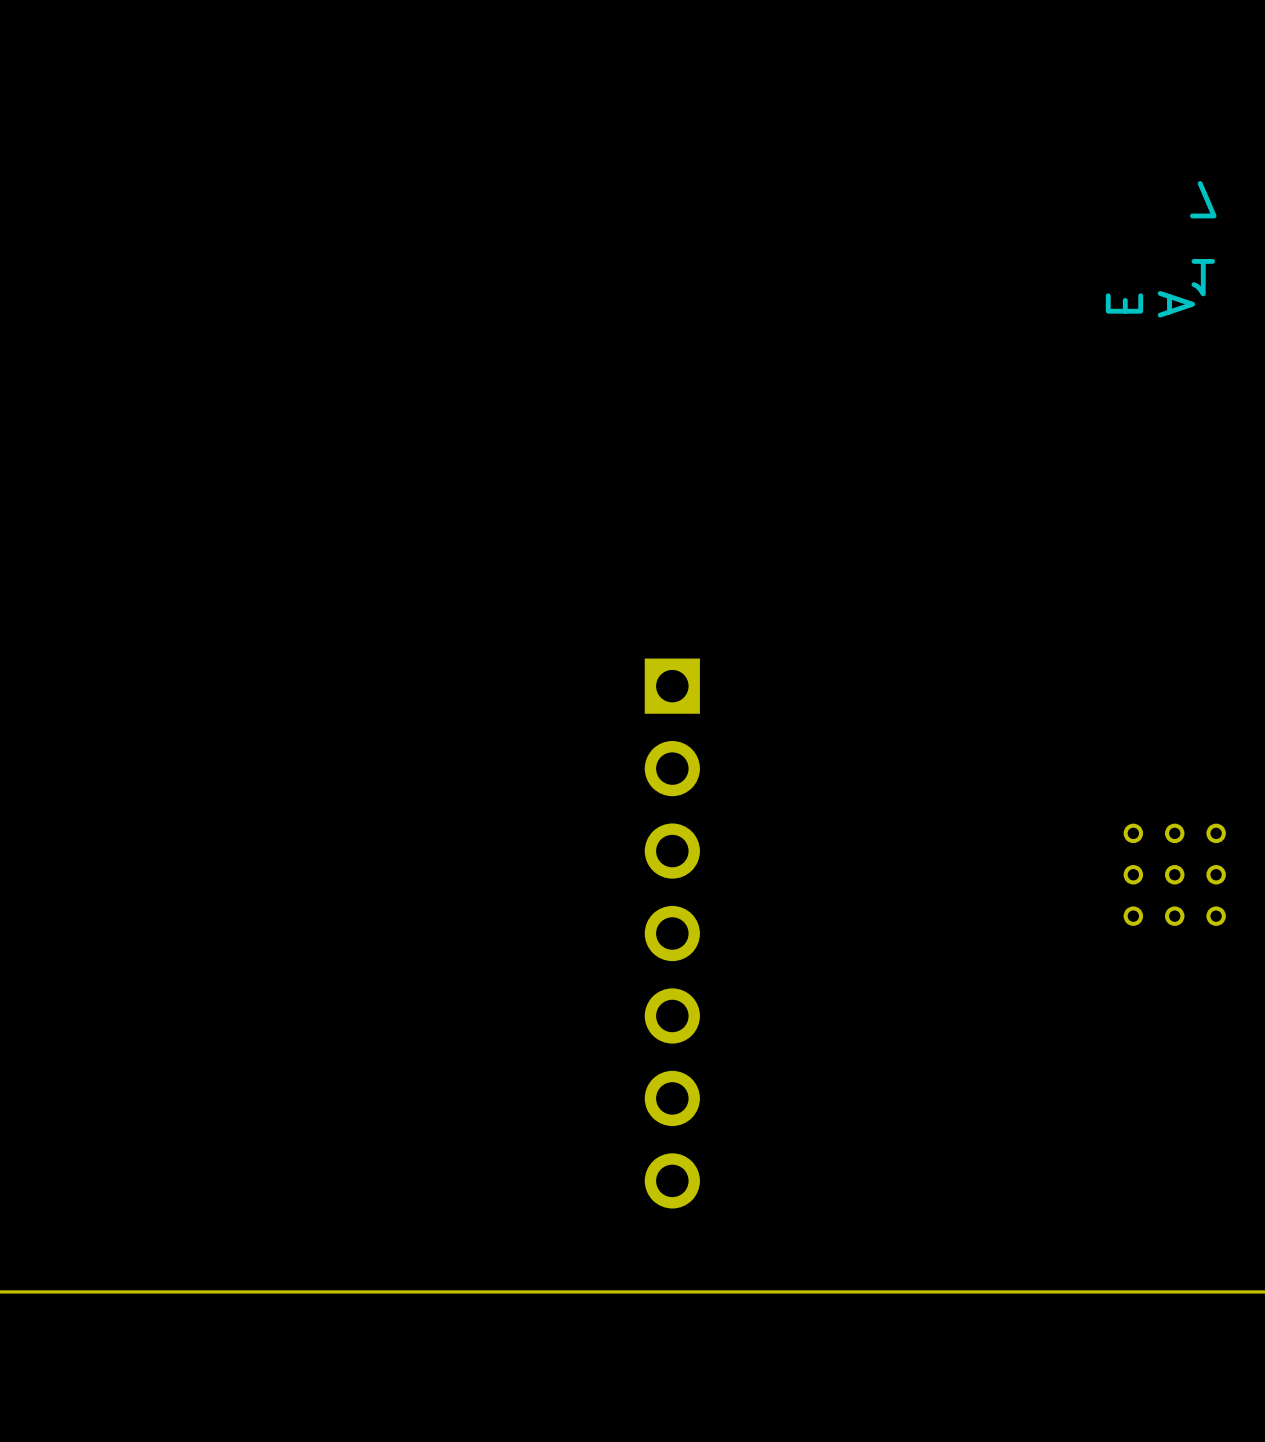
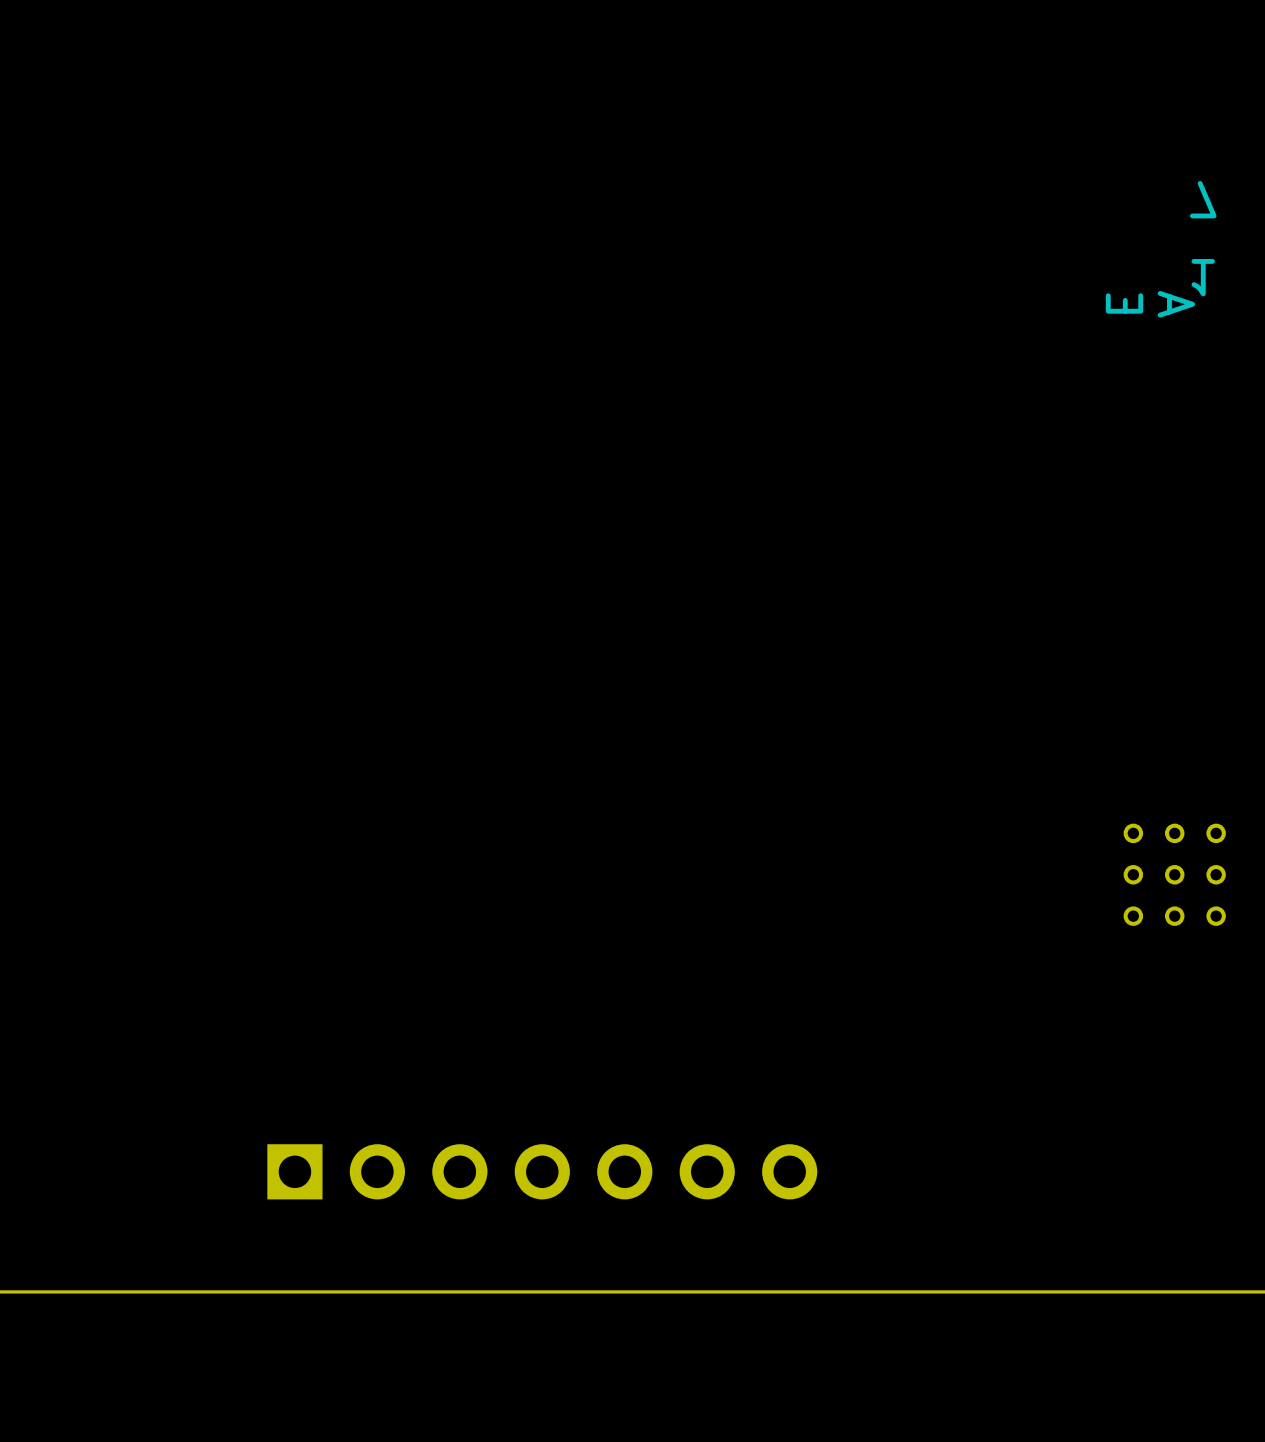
part rotation: 0° (672, 933) -> 90° counterclockwise (542, 1171)

